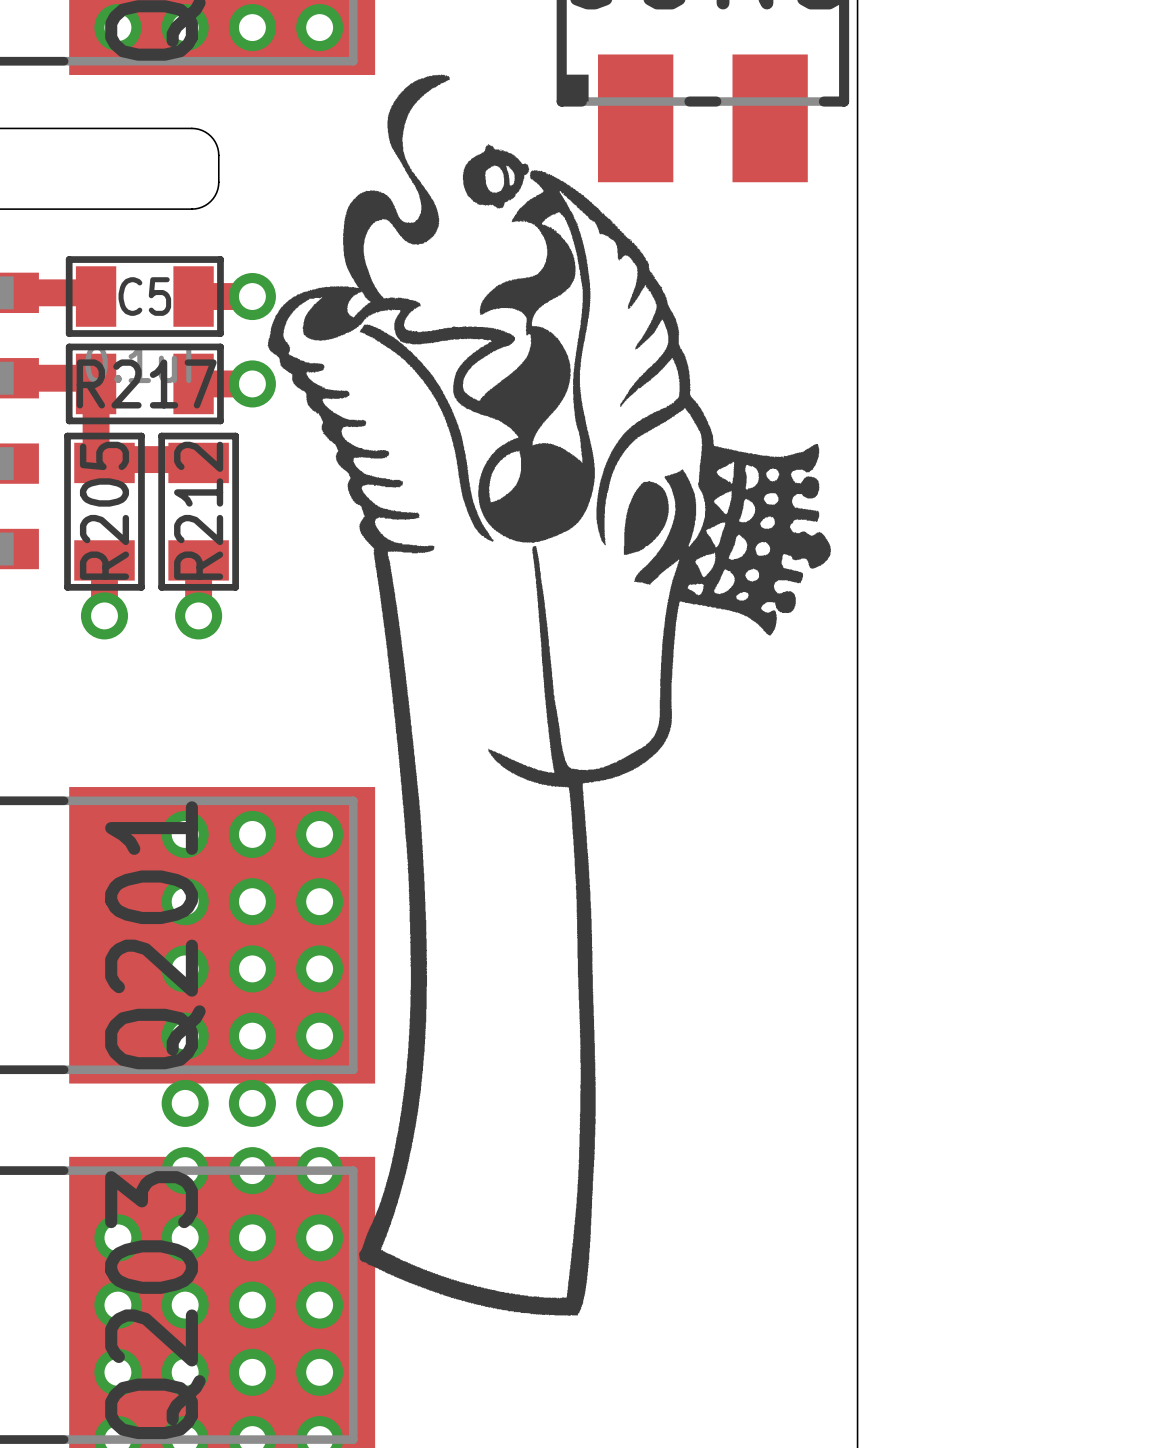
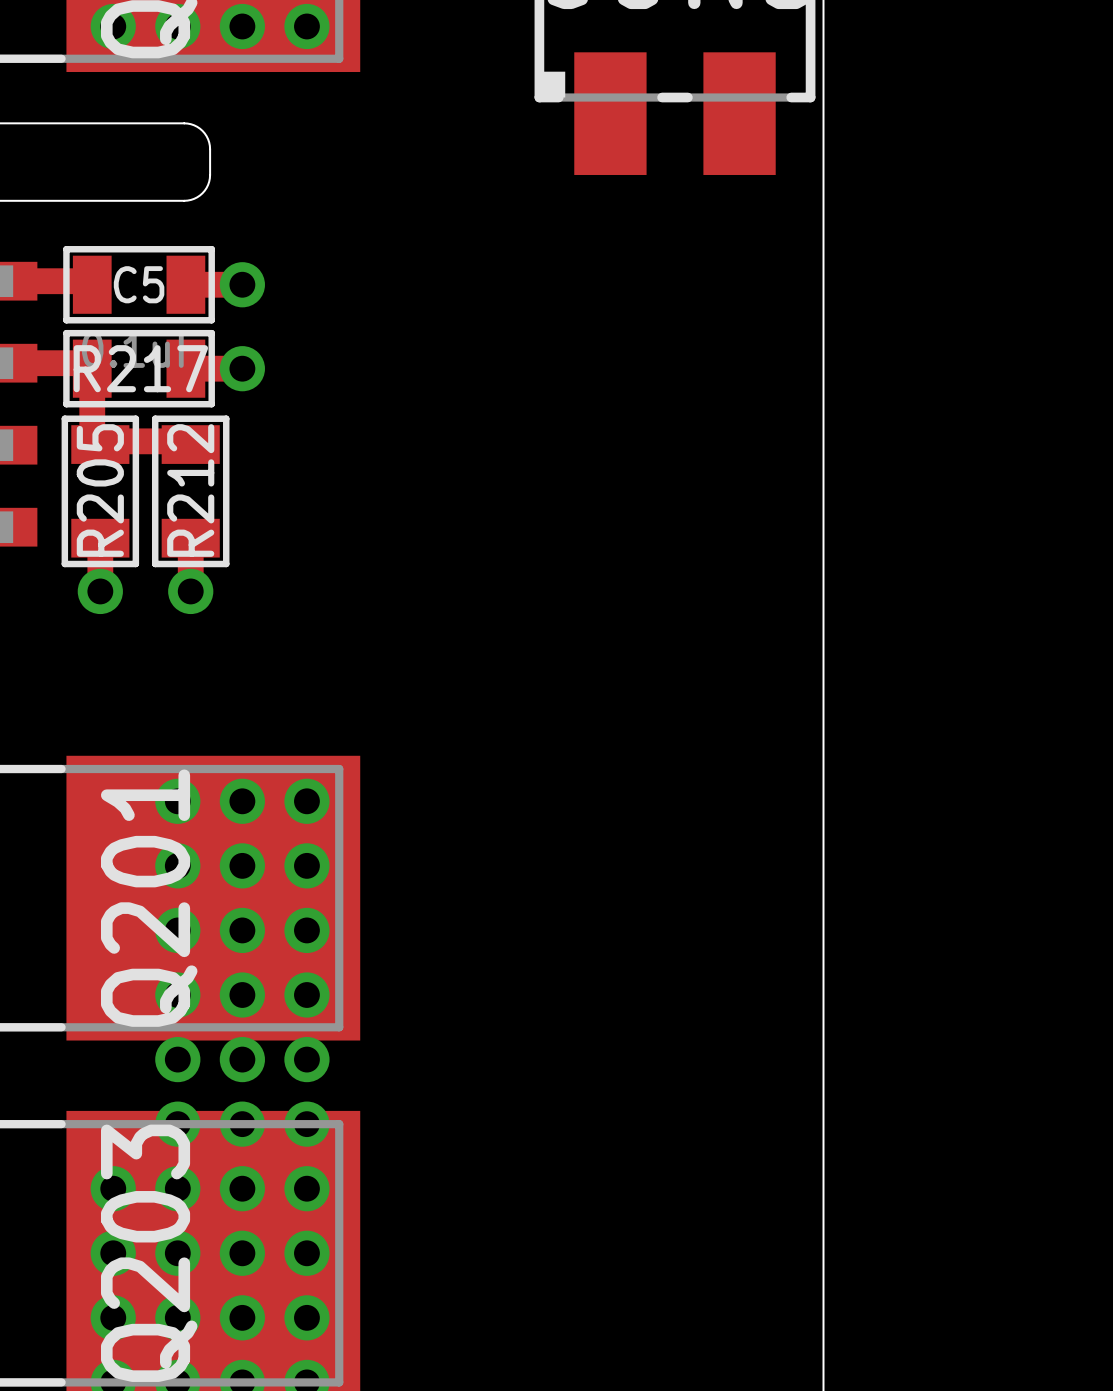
drawing: [267, 74, 831, 1316] -> none

